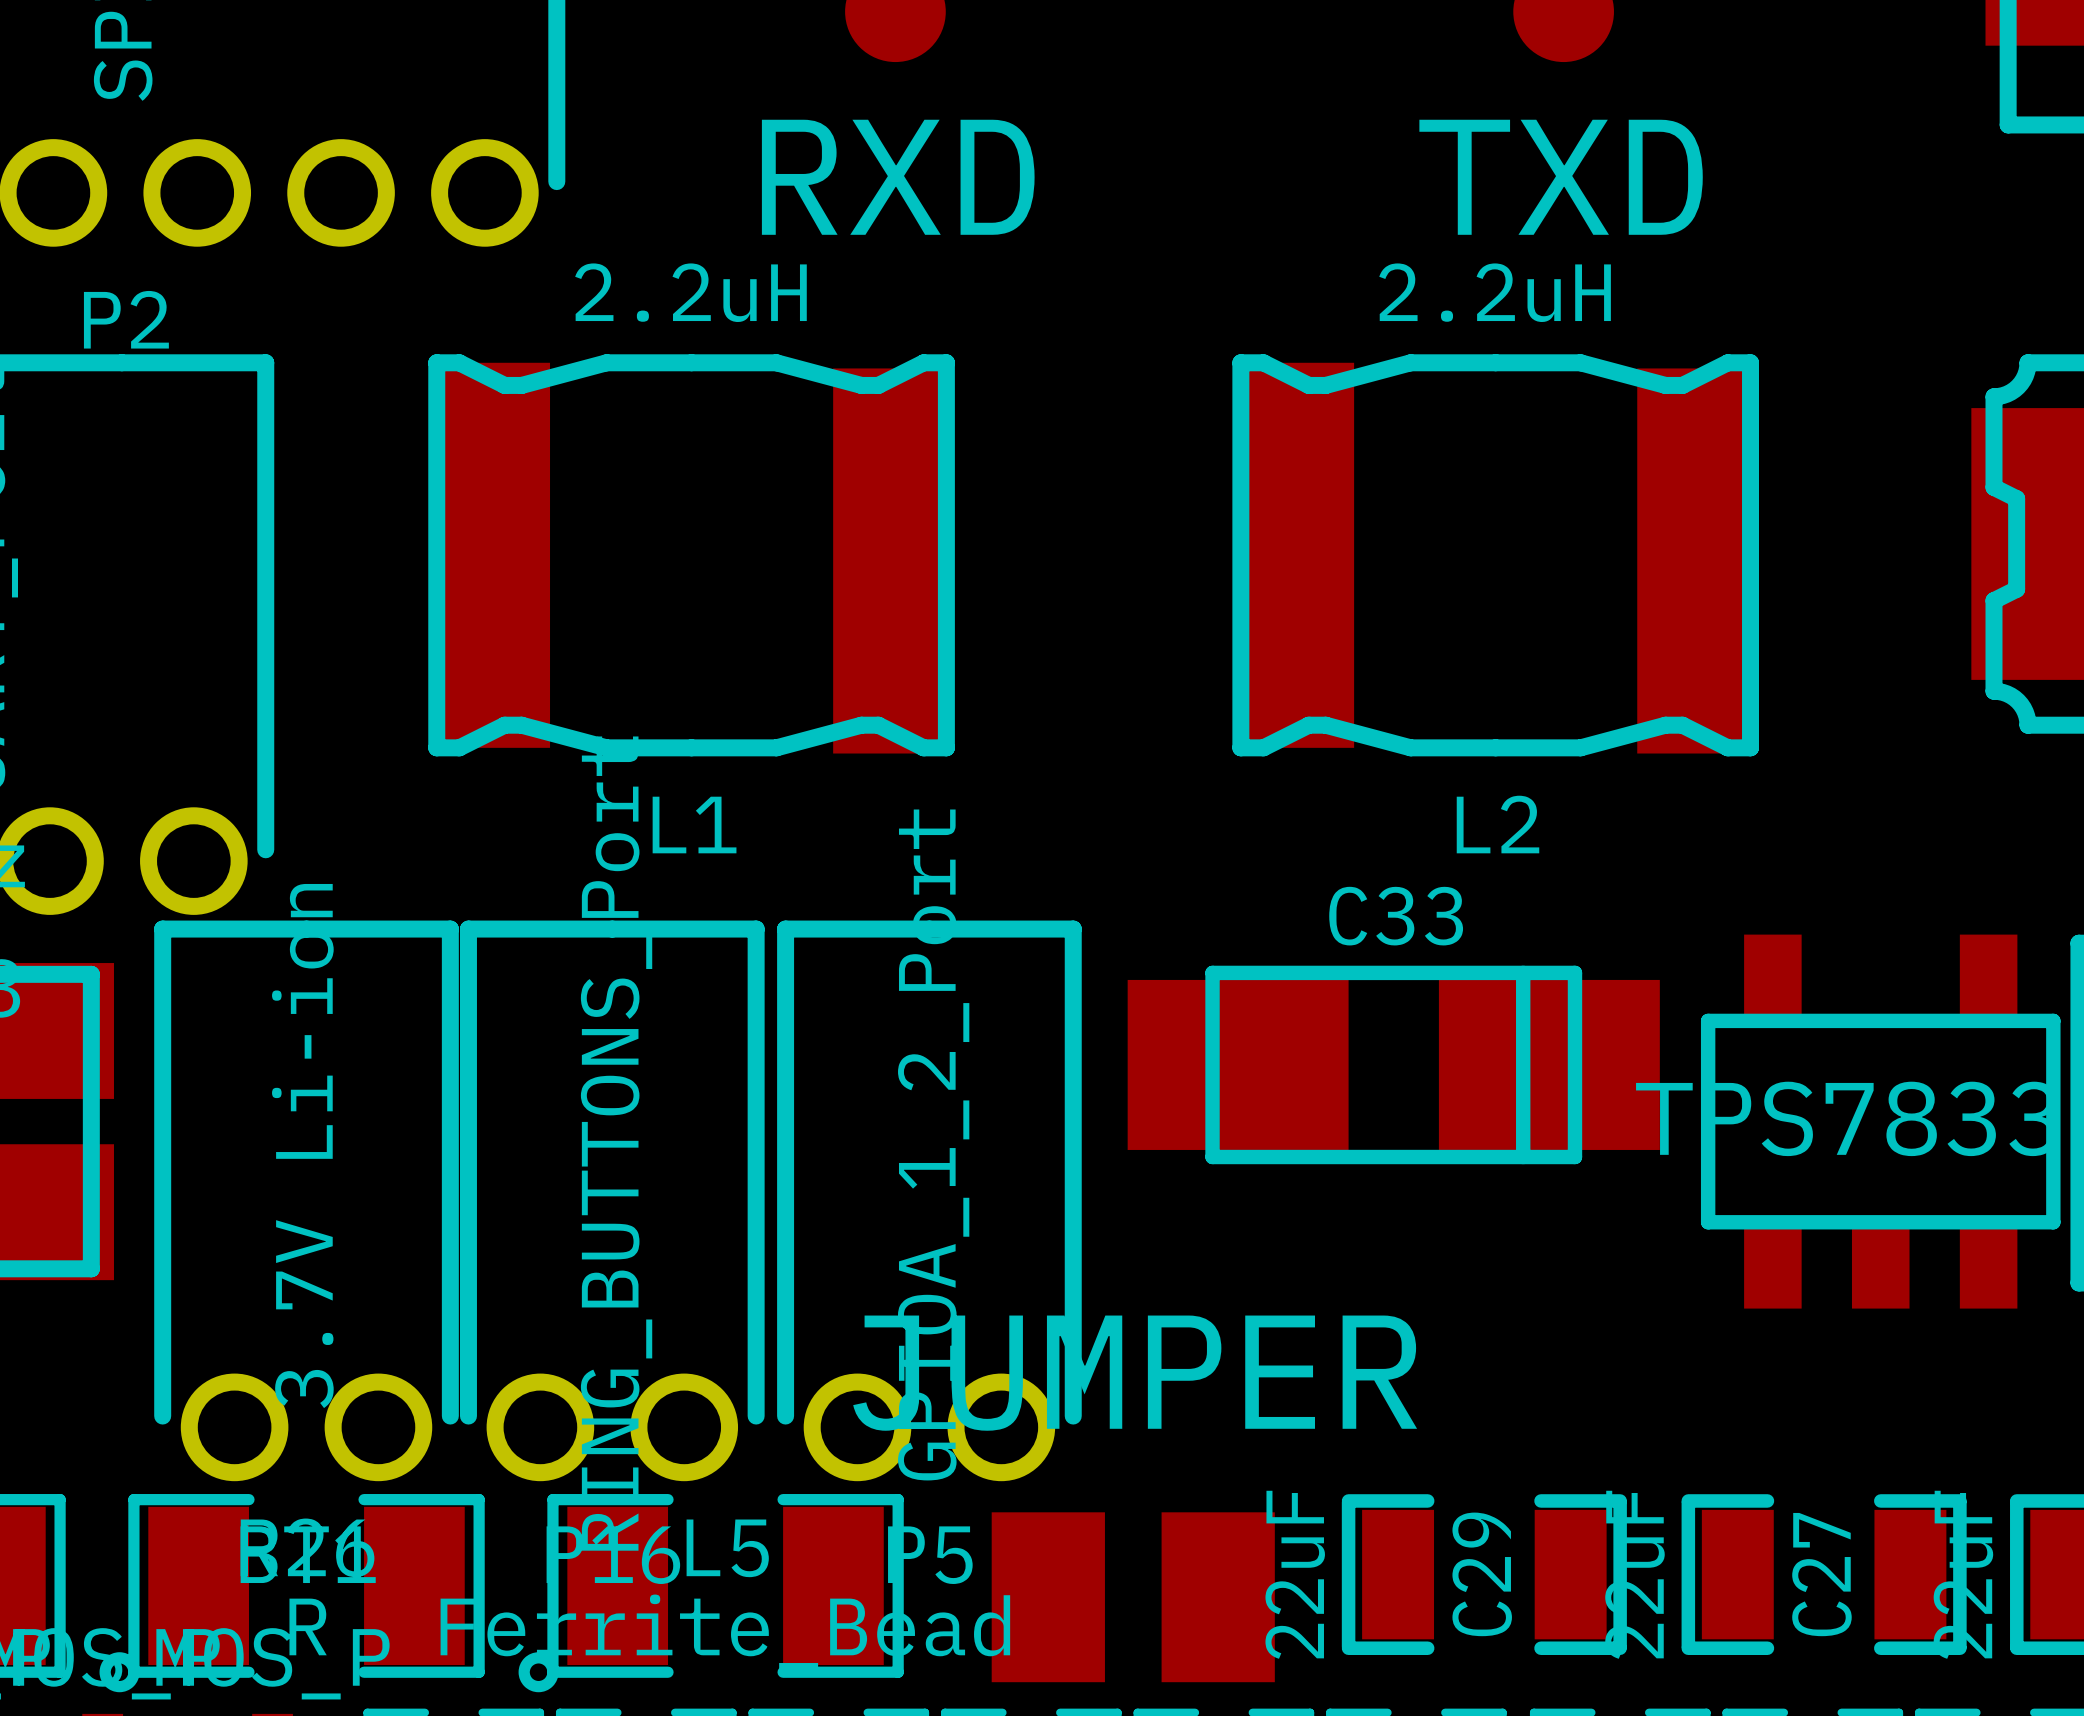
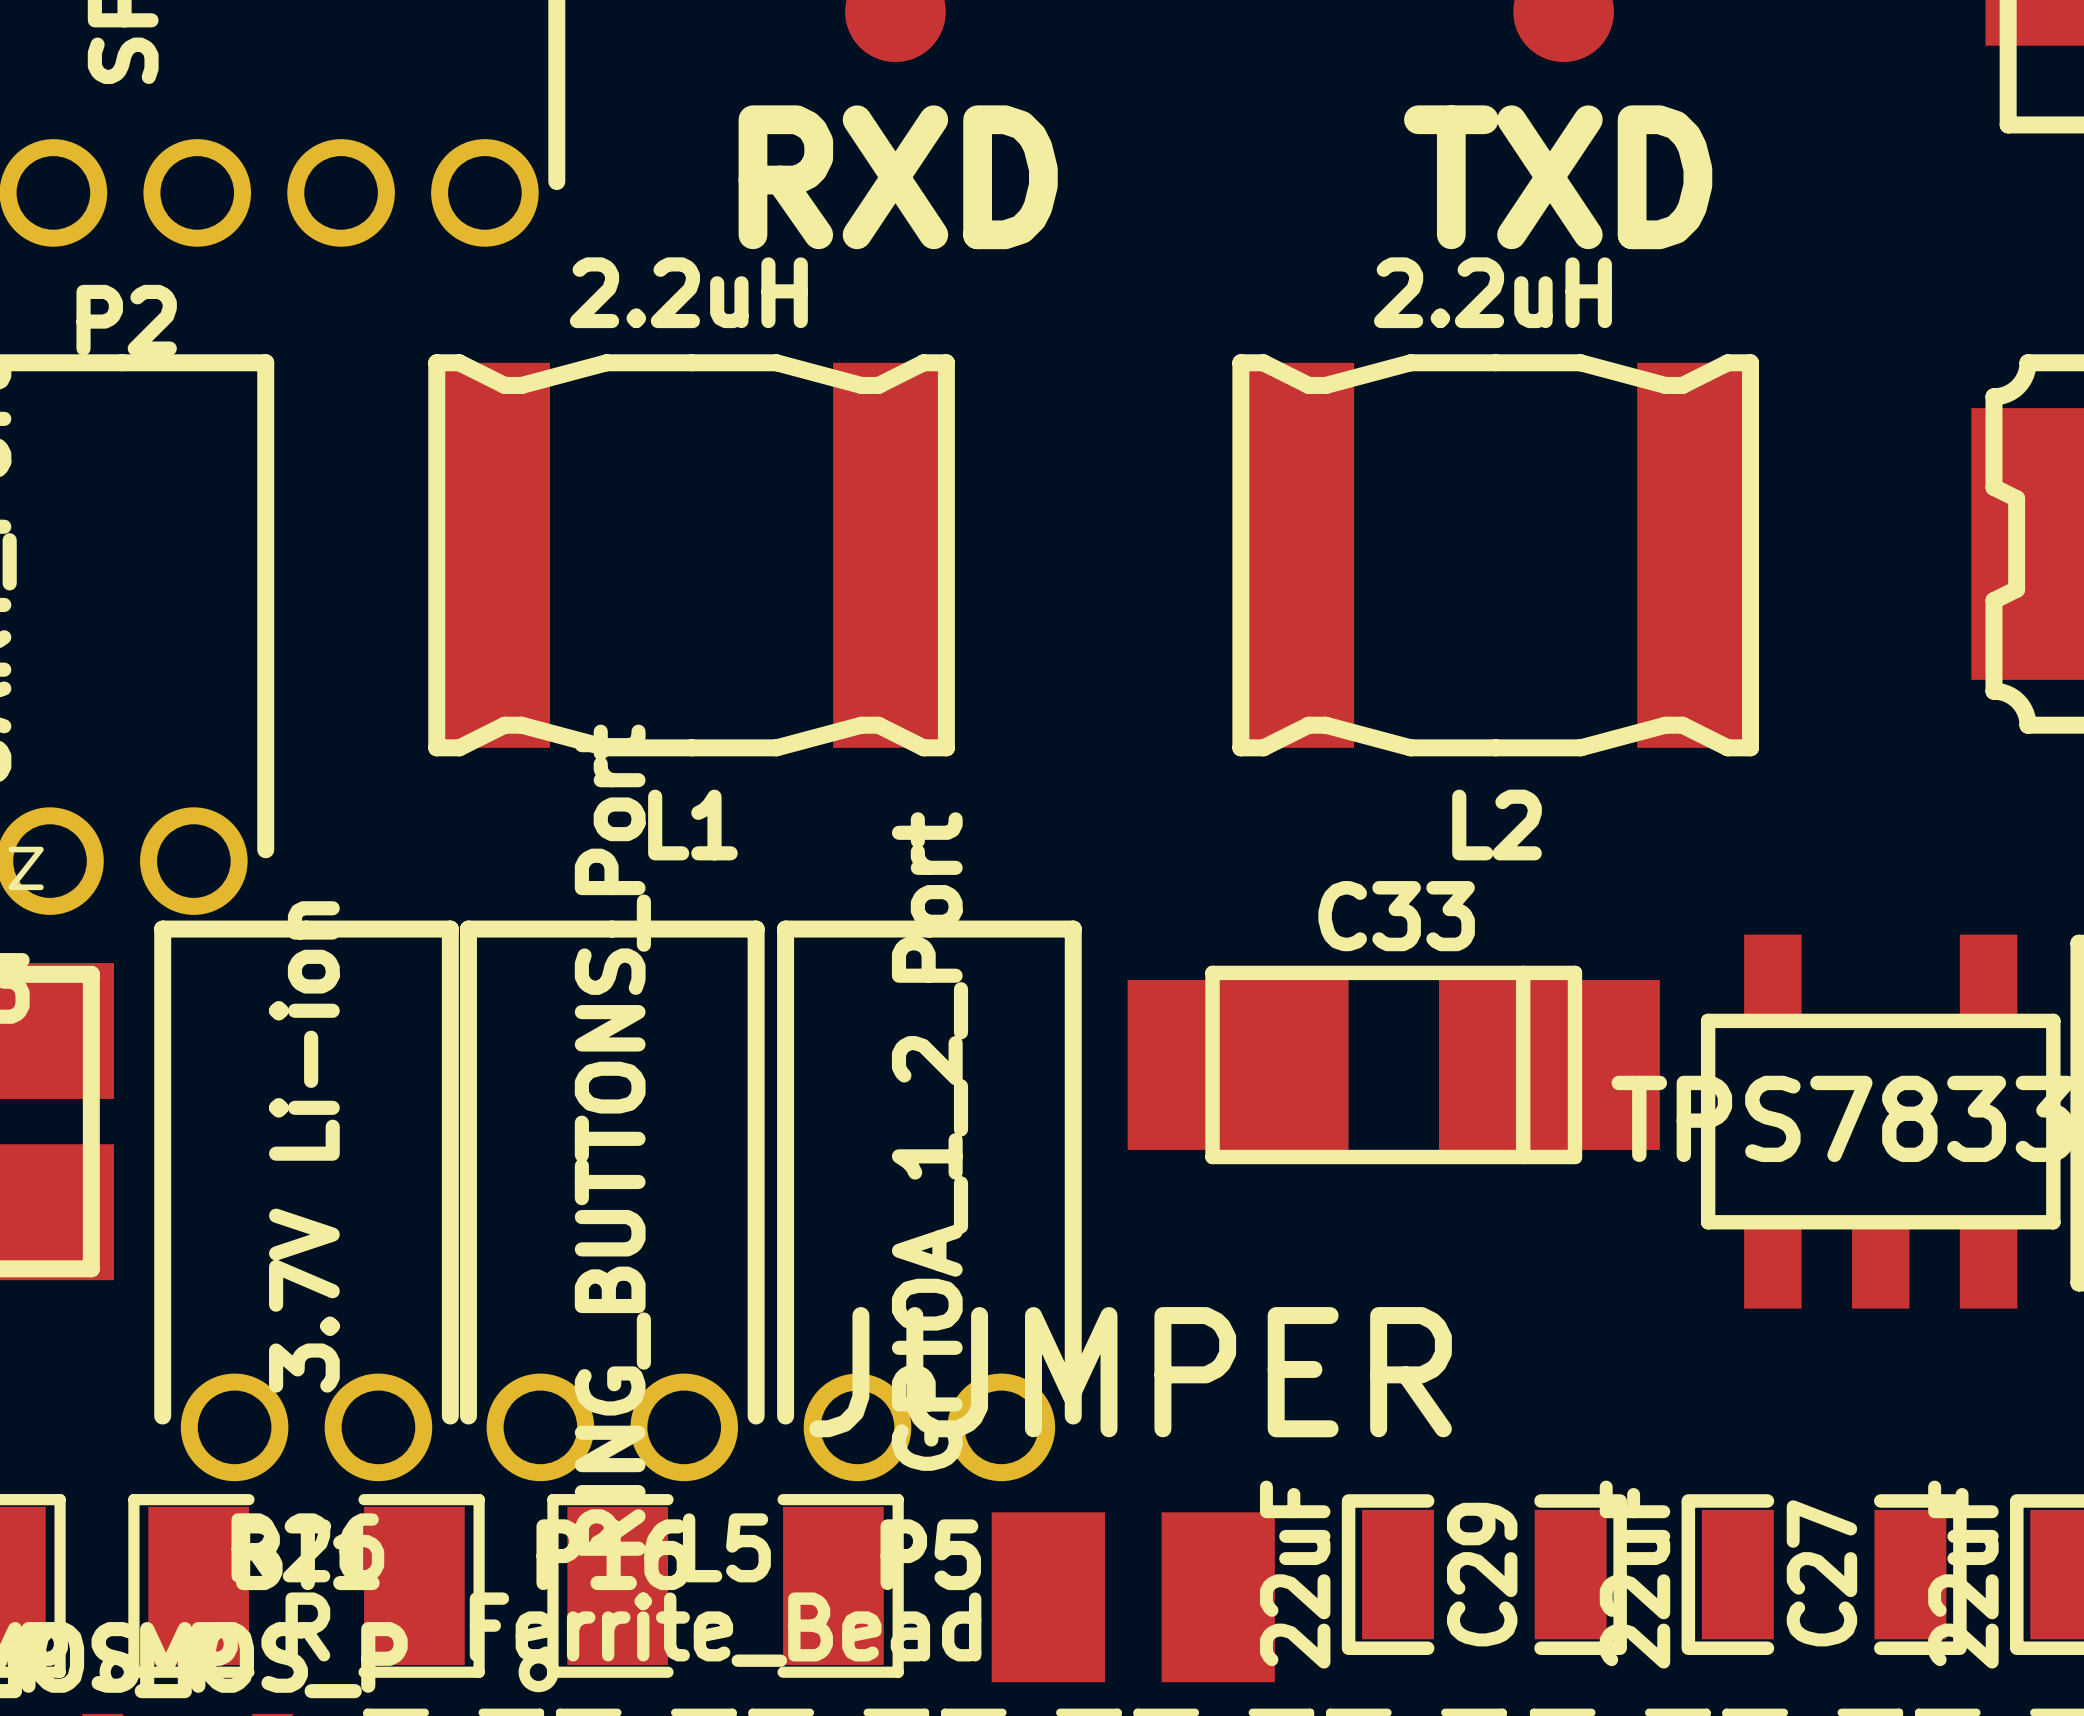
L1 footprint: [428, 354, 955, 757] -> [428, 354, 955, 757]
L2 footprint: [1232, 354, 1759, 757] -> [1232, 354, 1759, 757]

